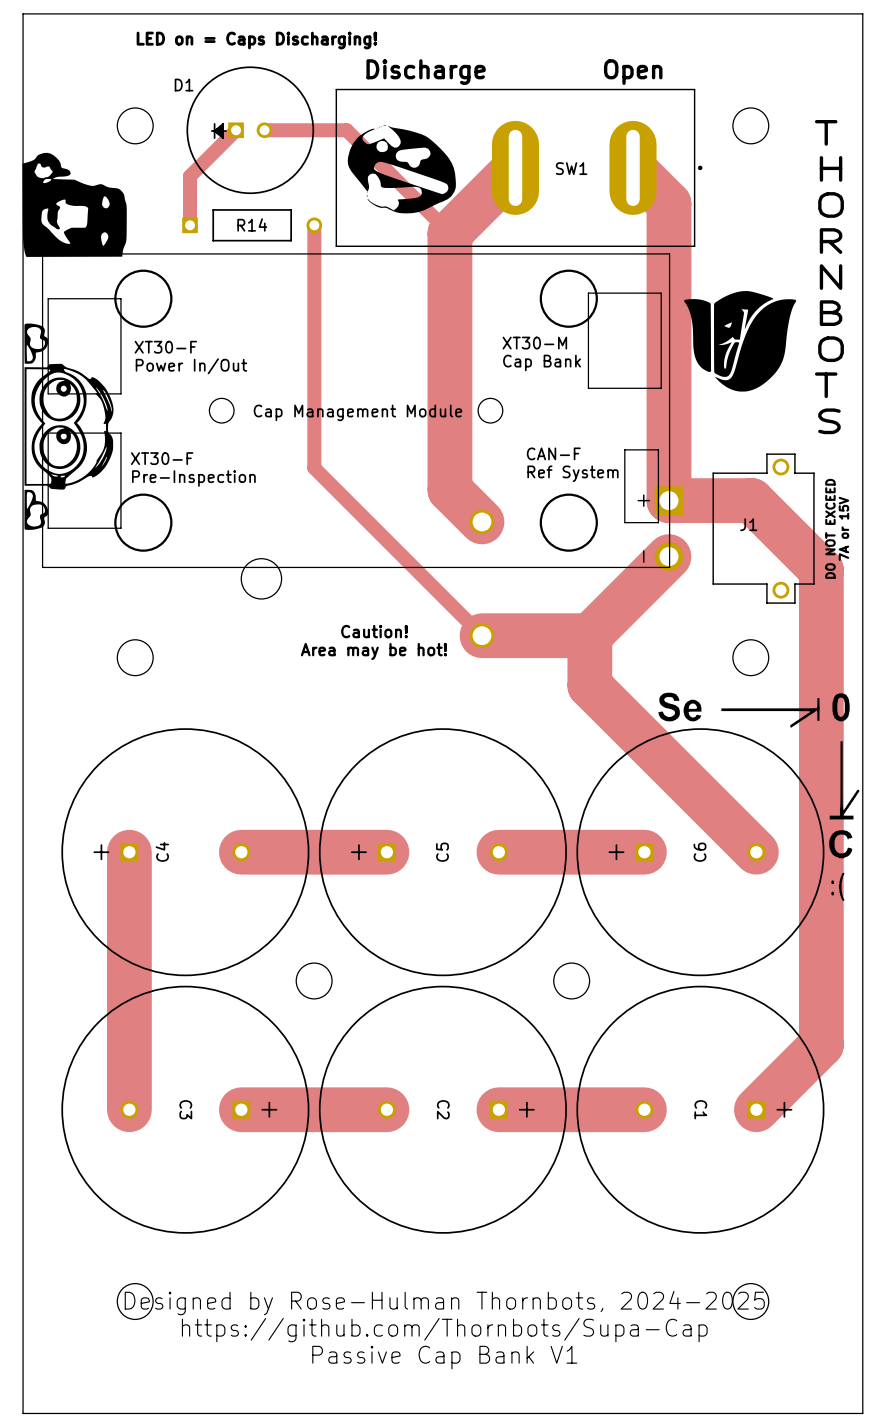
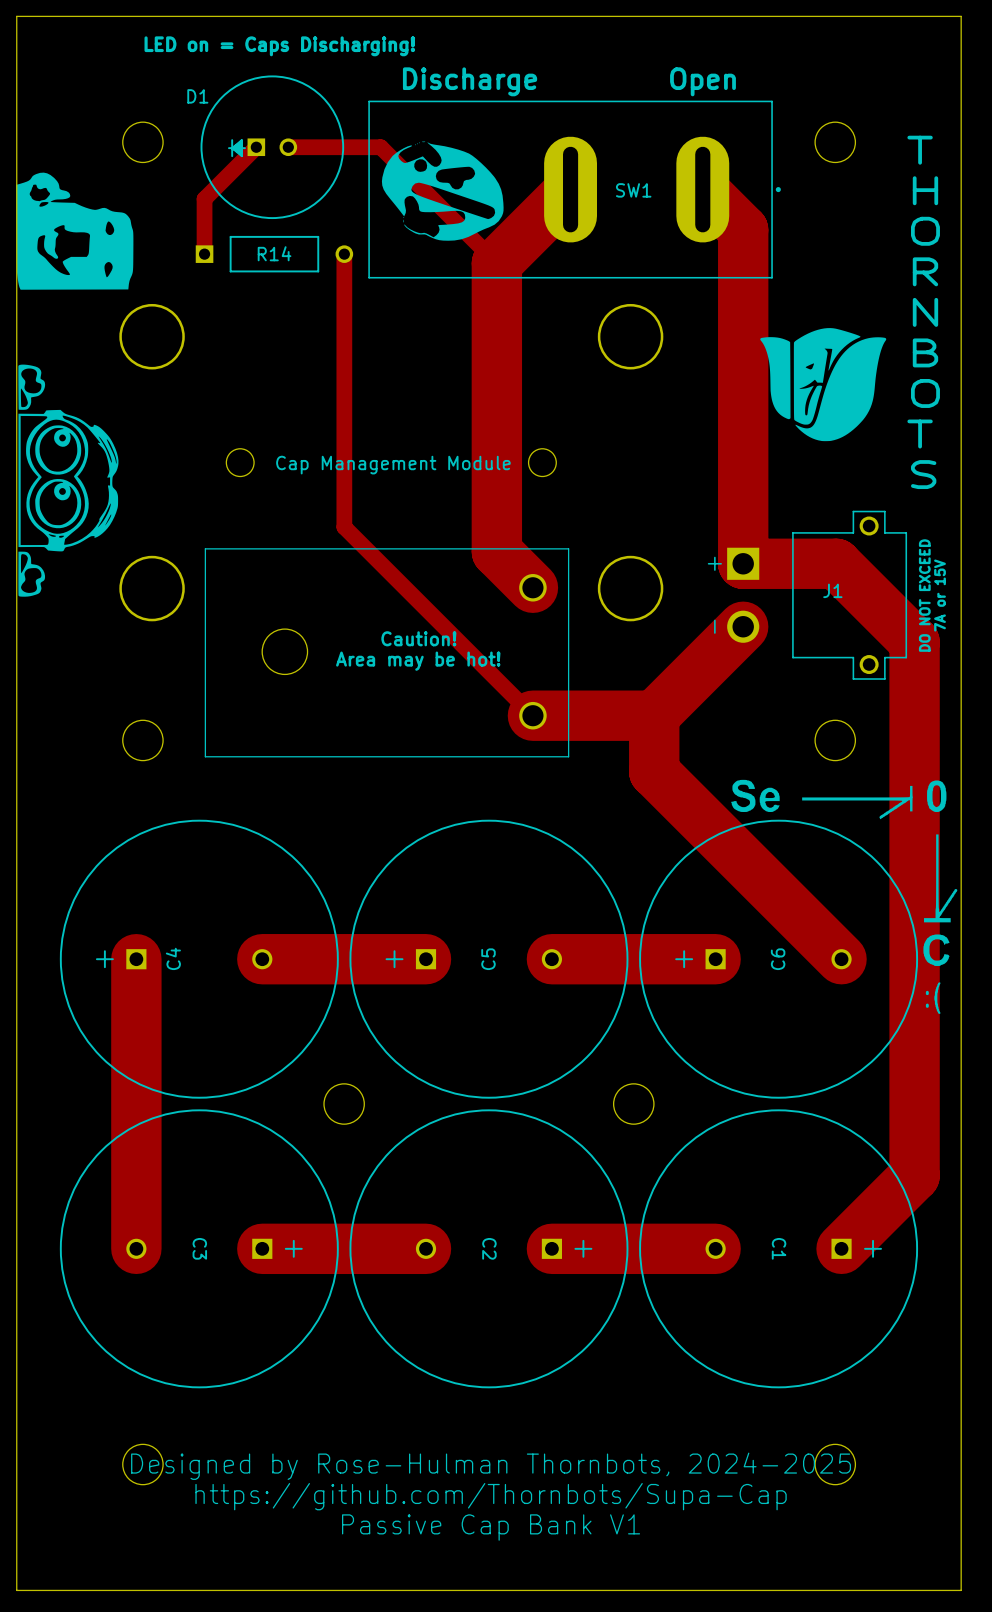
line: (42, 253) (669, 253) (669, 567) (42, 567) (42, 253) -> none
line: (588, 293) (661, 293) (661, 388) (588, 388) (588, 293) -> none
line: (48, 298) (48, 393) (120, 393) (120, 298) (48, 298) -> none
text: XT30-M (534, 343) -> none
text: XT30-F (165, 347) -> none
text: Cap Bank (542, 362) -> none
text: Power In/Out (191, 366) -> none
line: (48, 433) (120, 433) (120, 528) (48, 528) (48, 433) -> none
line: (624, 449) (658, 449) (658, 522) (624, 522) (624, 449) -> none
text: CAN-F (553, 453) -> none
text: XT30-F (162, 458) -> none
text: Ref System (572, 473) -> none
text: Pre-Inspection (193, 478) -> none
line: none -> (205, 548) (568, 548) (568, 756) (205, 756) (205, 548)
text position: Caution! (374, 631) -> Caution! (418, 638)
text position: Area may be hot! (373, 651) -> Area may be hot! (418, 661)

